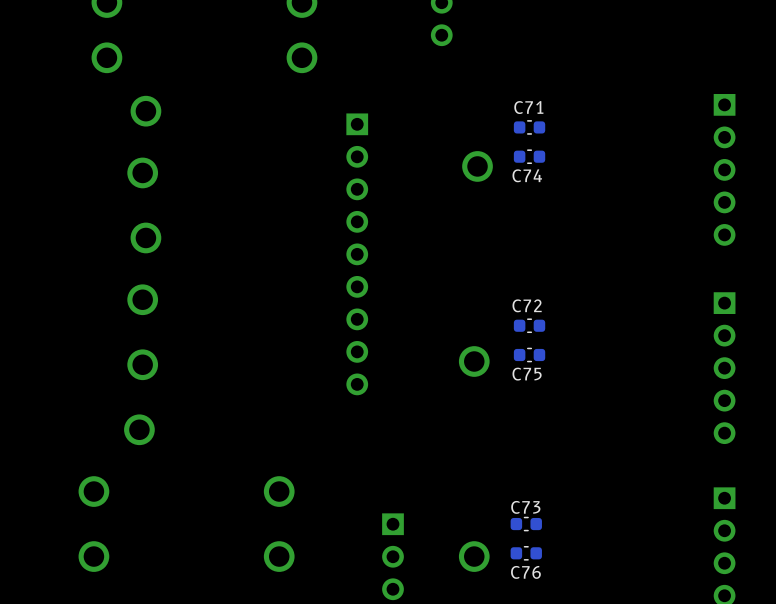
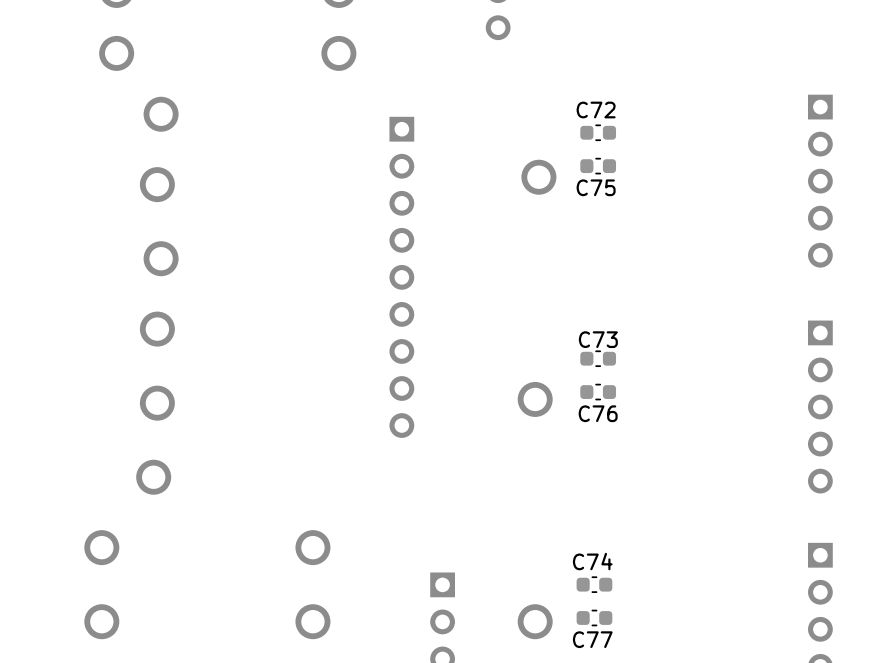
C71 name: C71 (528, 107) -> C72 (596, 110)
C74 name: C74 (527, 175) -> C75 (596, 187)
C72 name: C72 (527, 305) -> C73 (598, 339)
C75 name: C75 (527, 374) -> C76 (598, 413)
C73 name: C73 (525, 507) -> C74 (592, 561)
C76 name: C76 (525, 572) -> C77 (592, 639)

